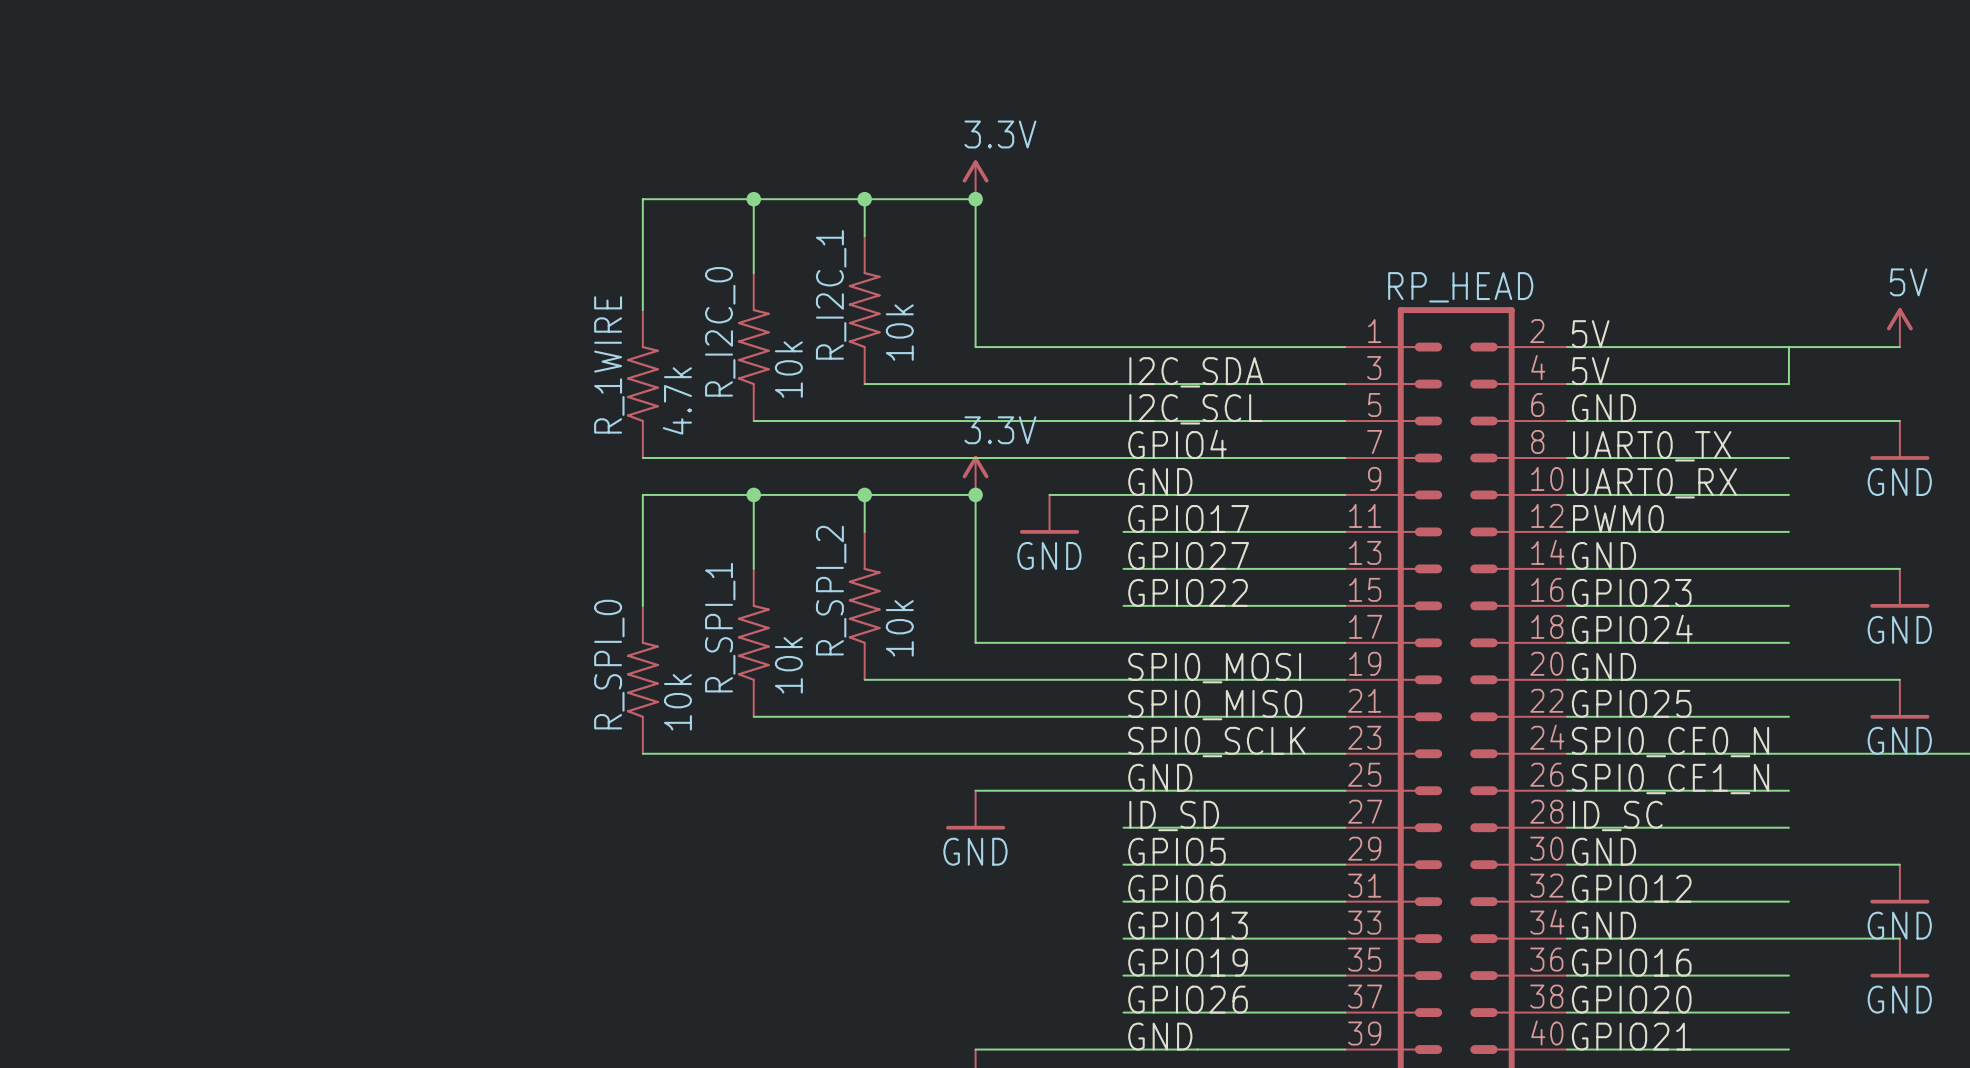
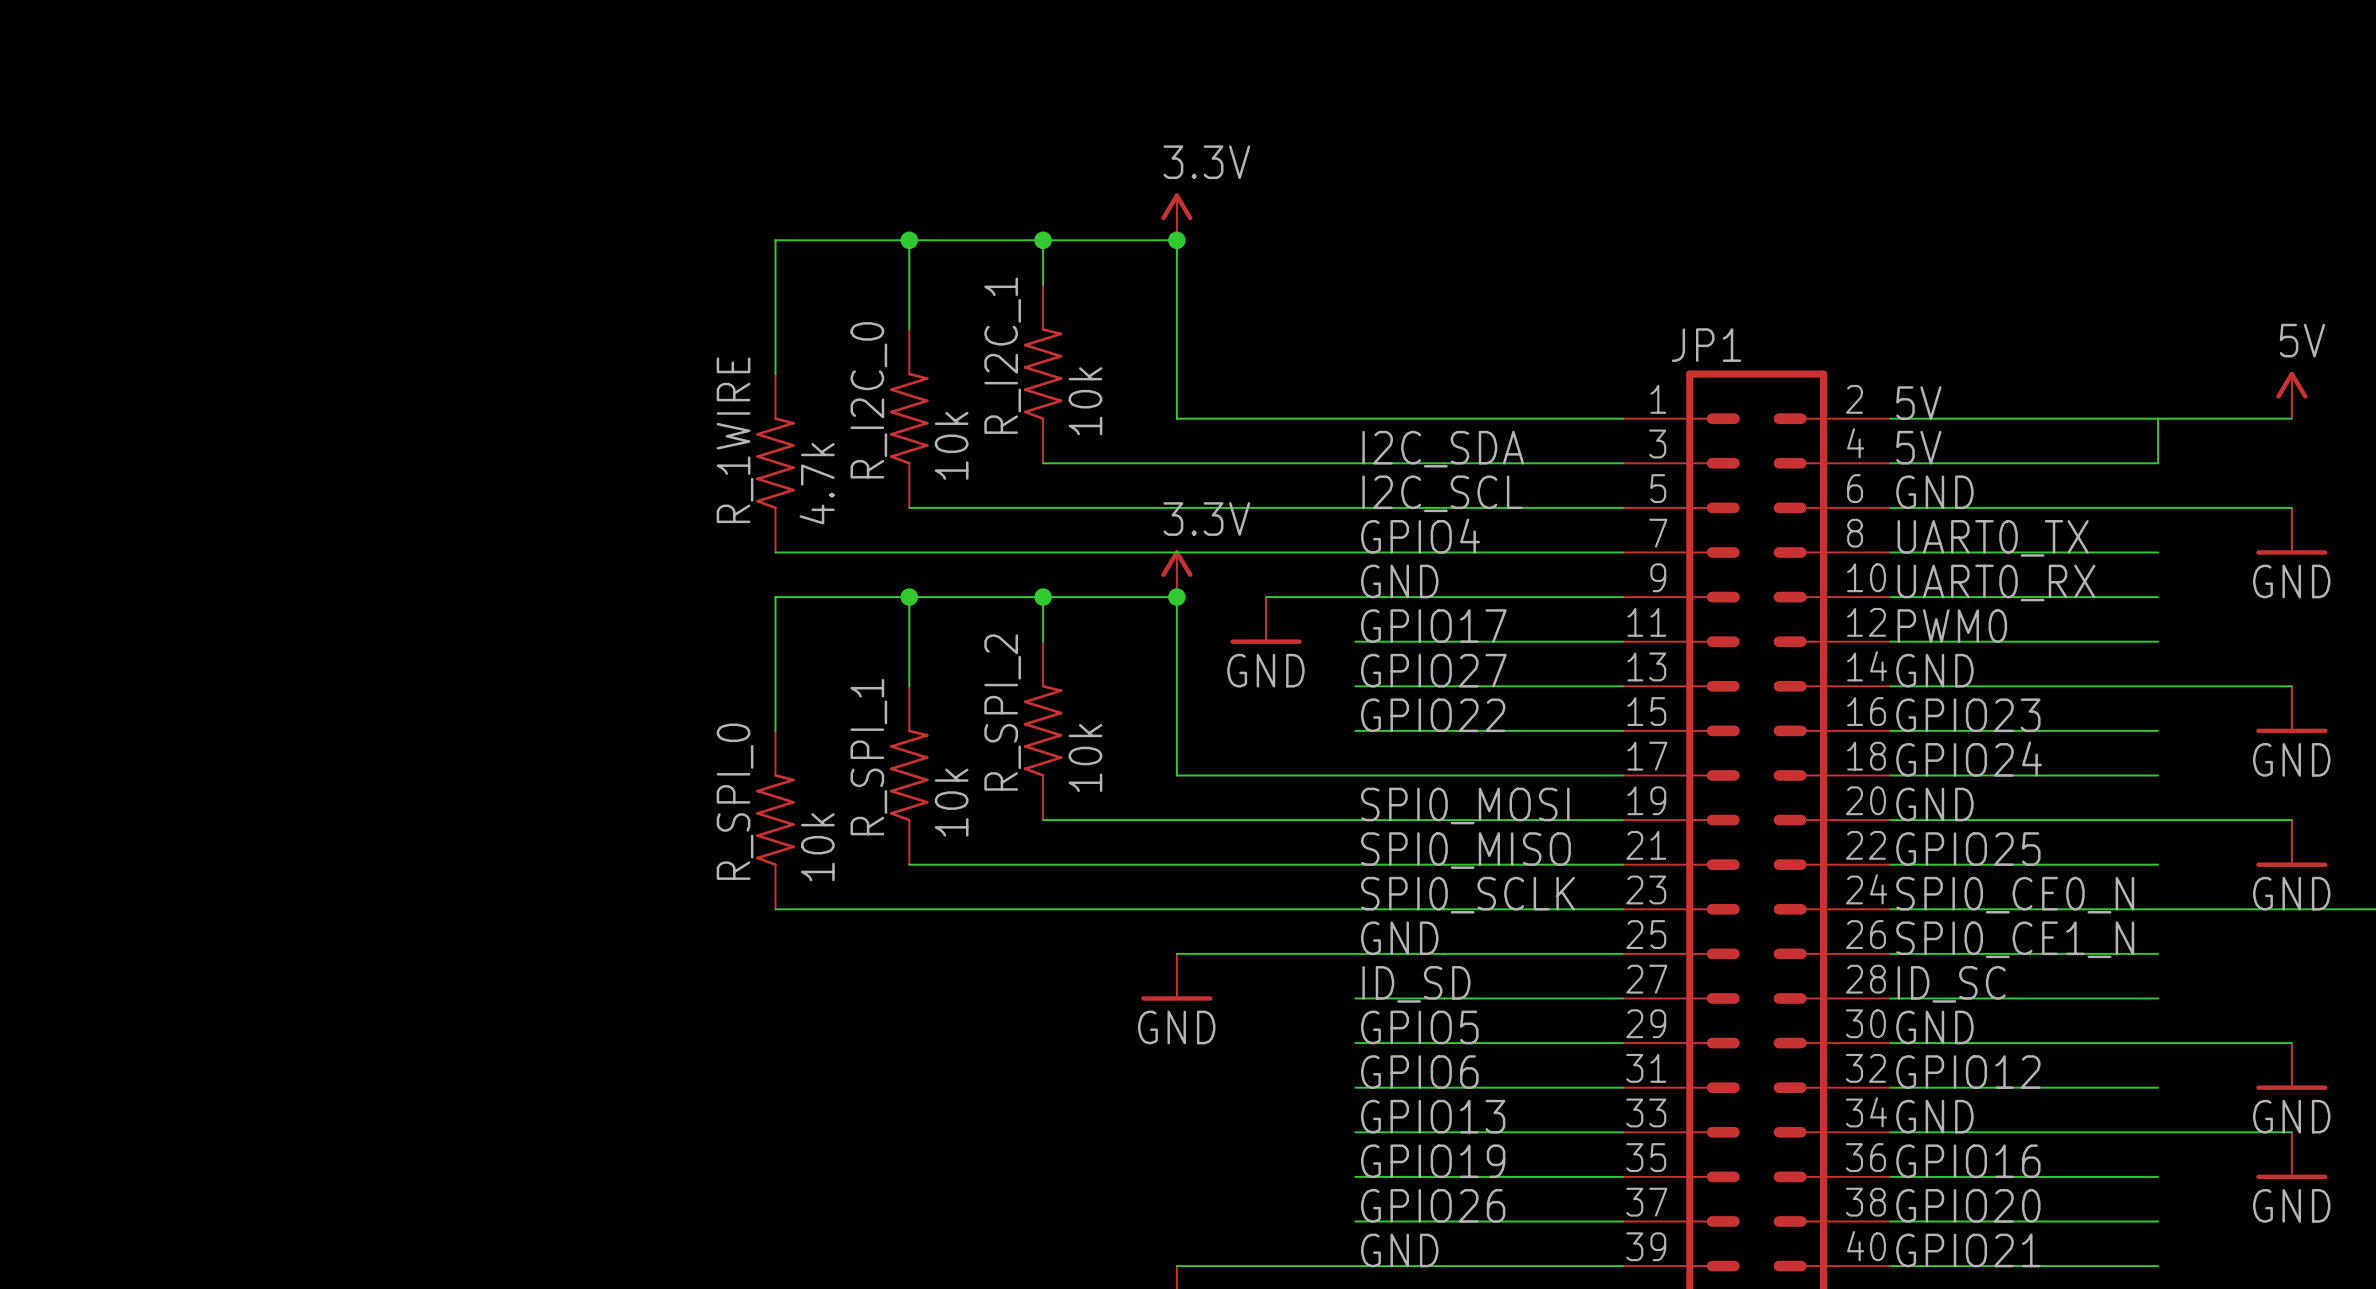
RP_HEAD name: RP_HEAD (1460, 287) -> JP1 (1706, 345)

